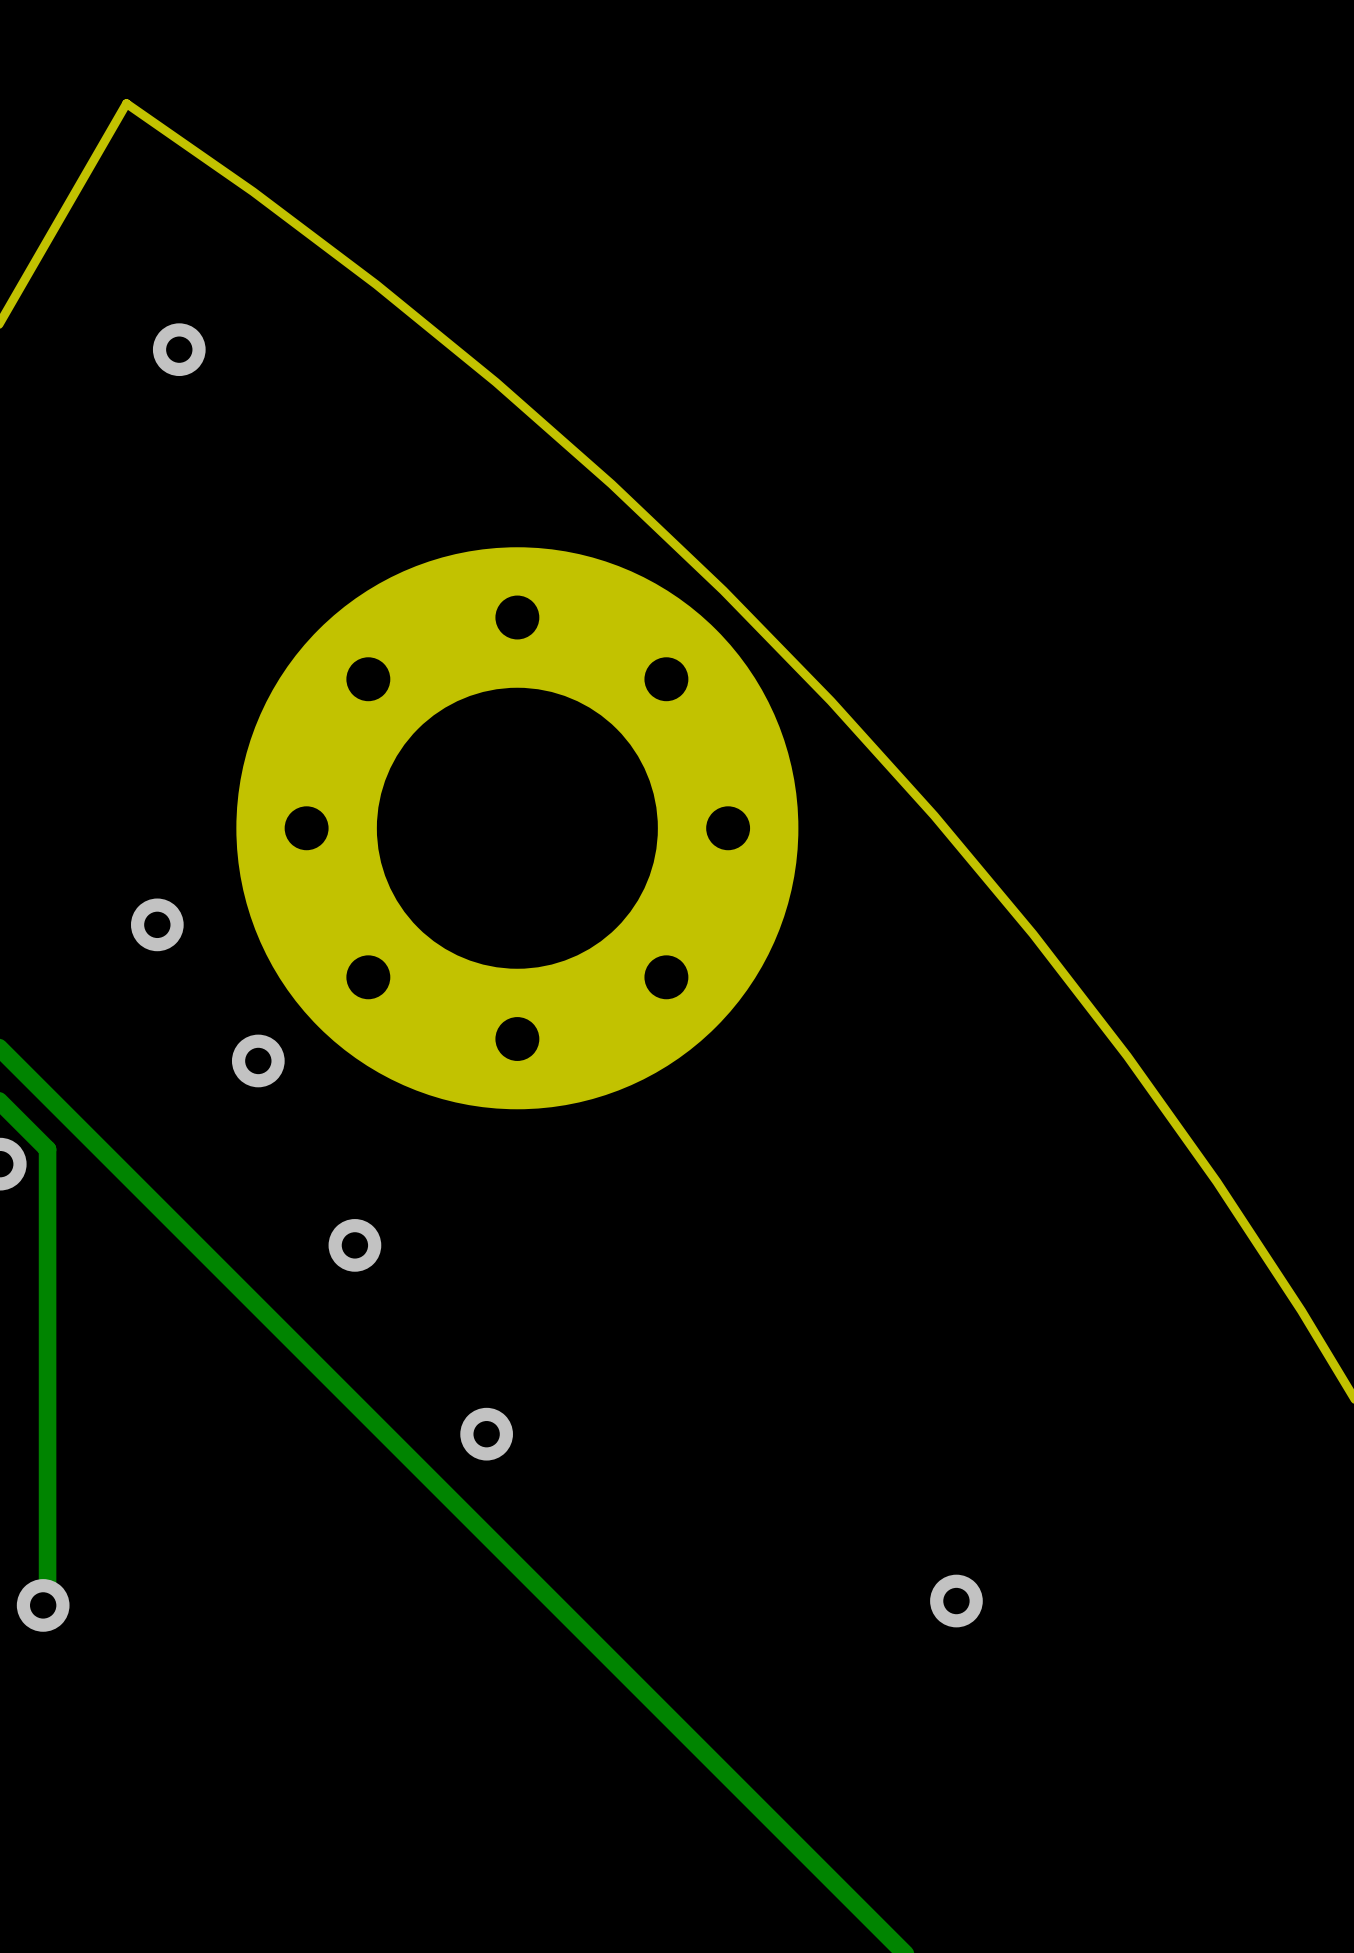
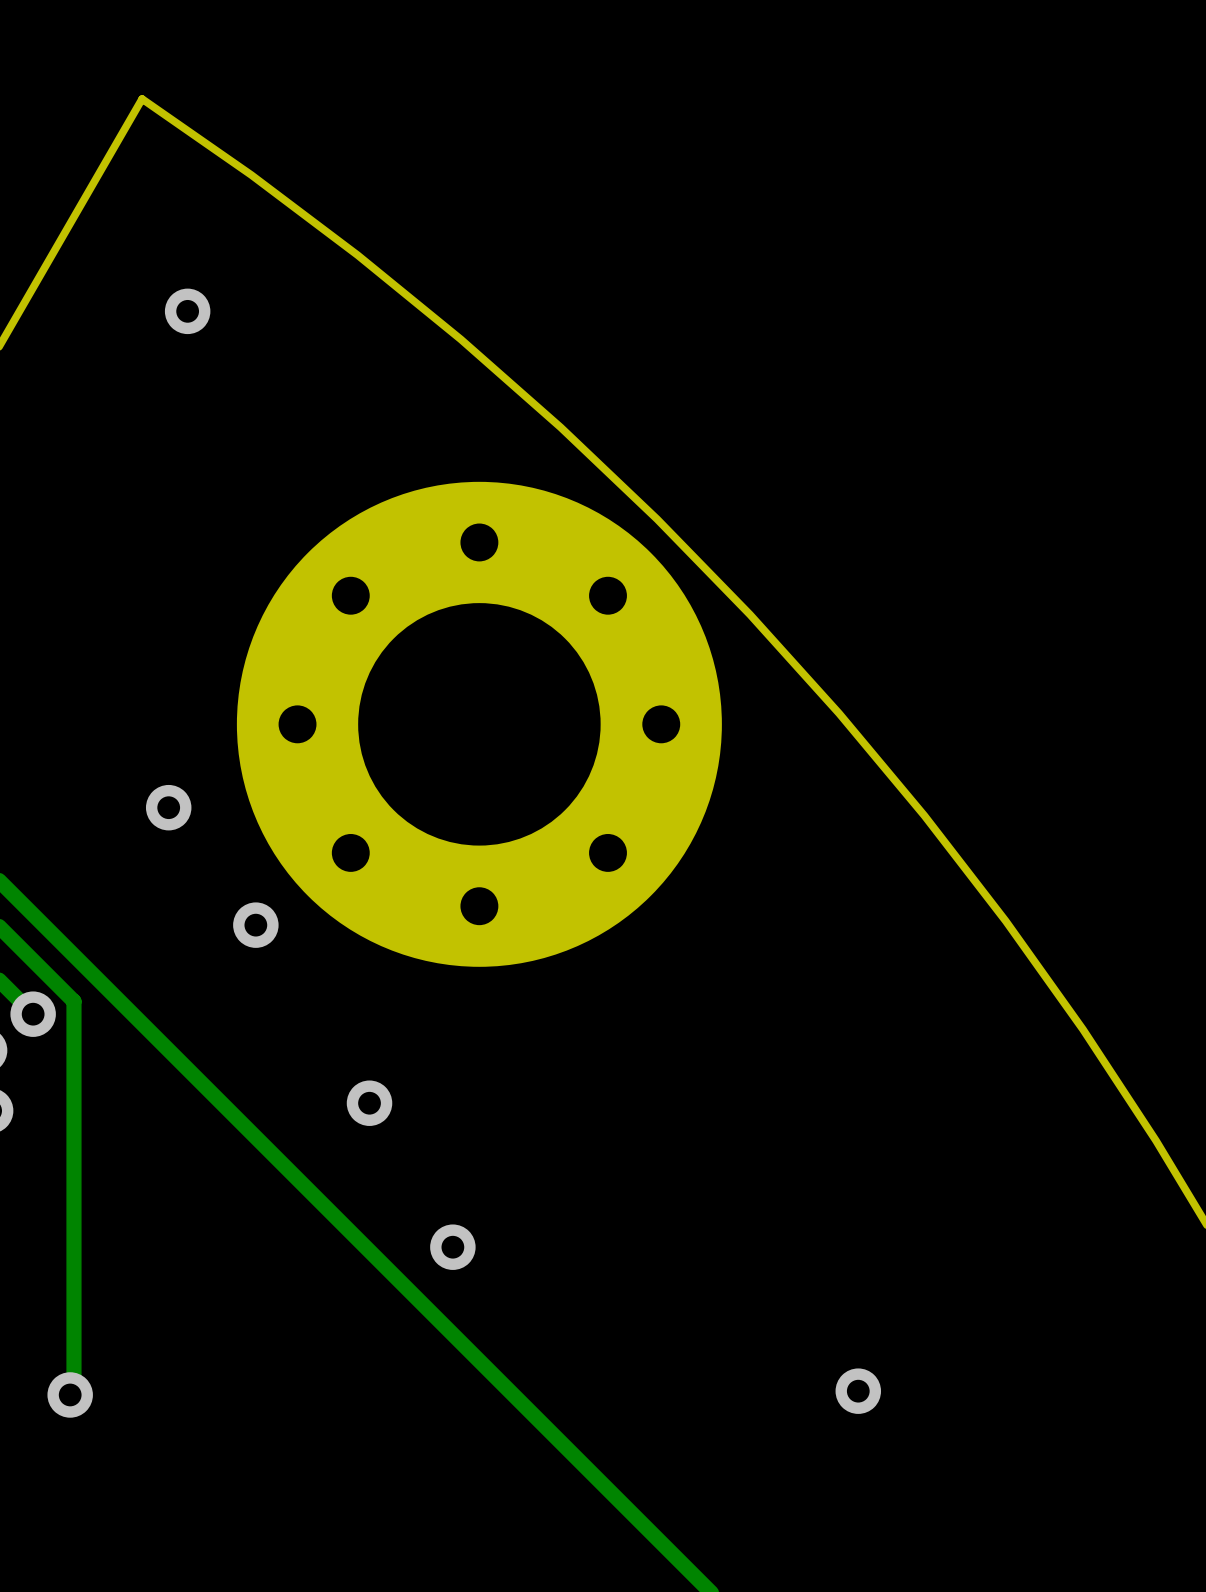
via position: (354, 1245) -> (369, 1103)

